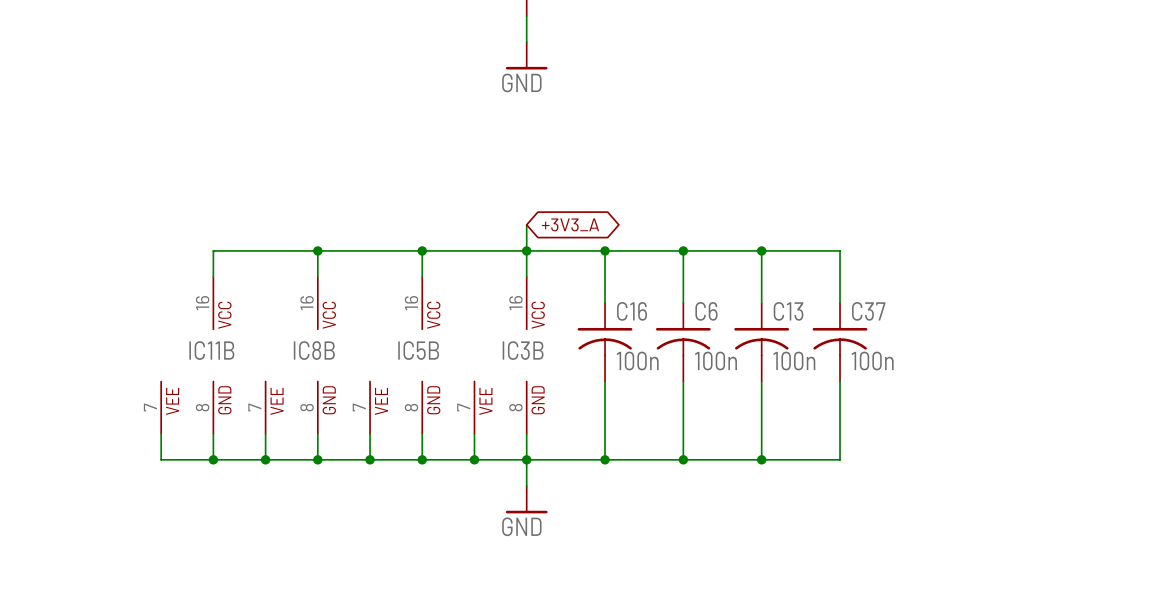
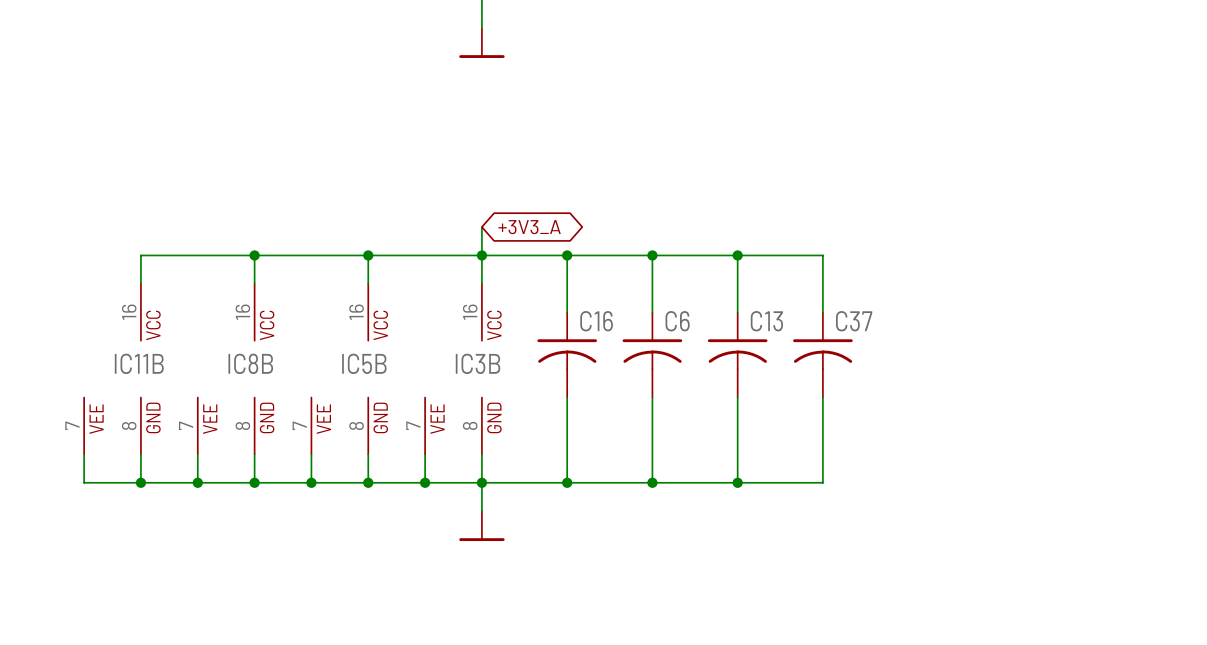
power symbol text: GND (521, 82) -> none
C16 value: 100n (637, 361) -> none
C6 value: 100n (716, 361) -> none
C13 value: 100n (794, 361) -> none
C37 value: 100n (872, 361) -> none
power symbol text: GND (521, 526) -> none

